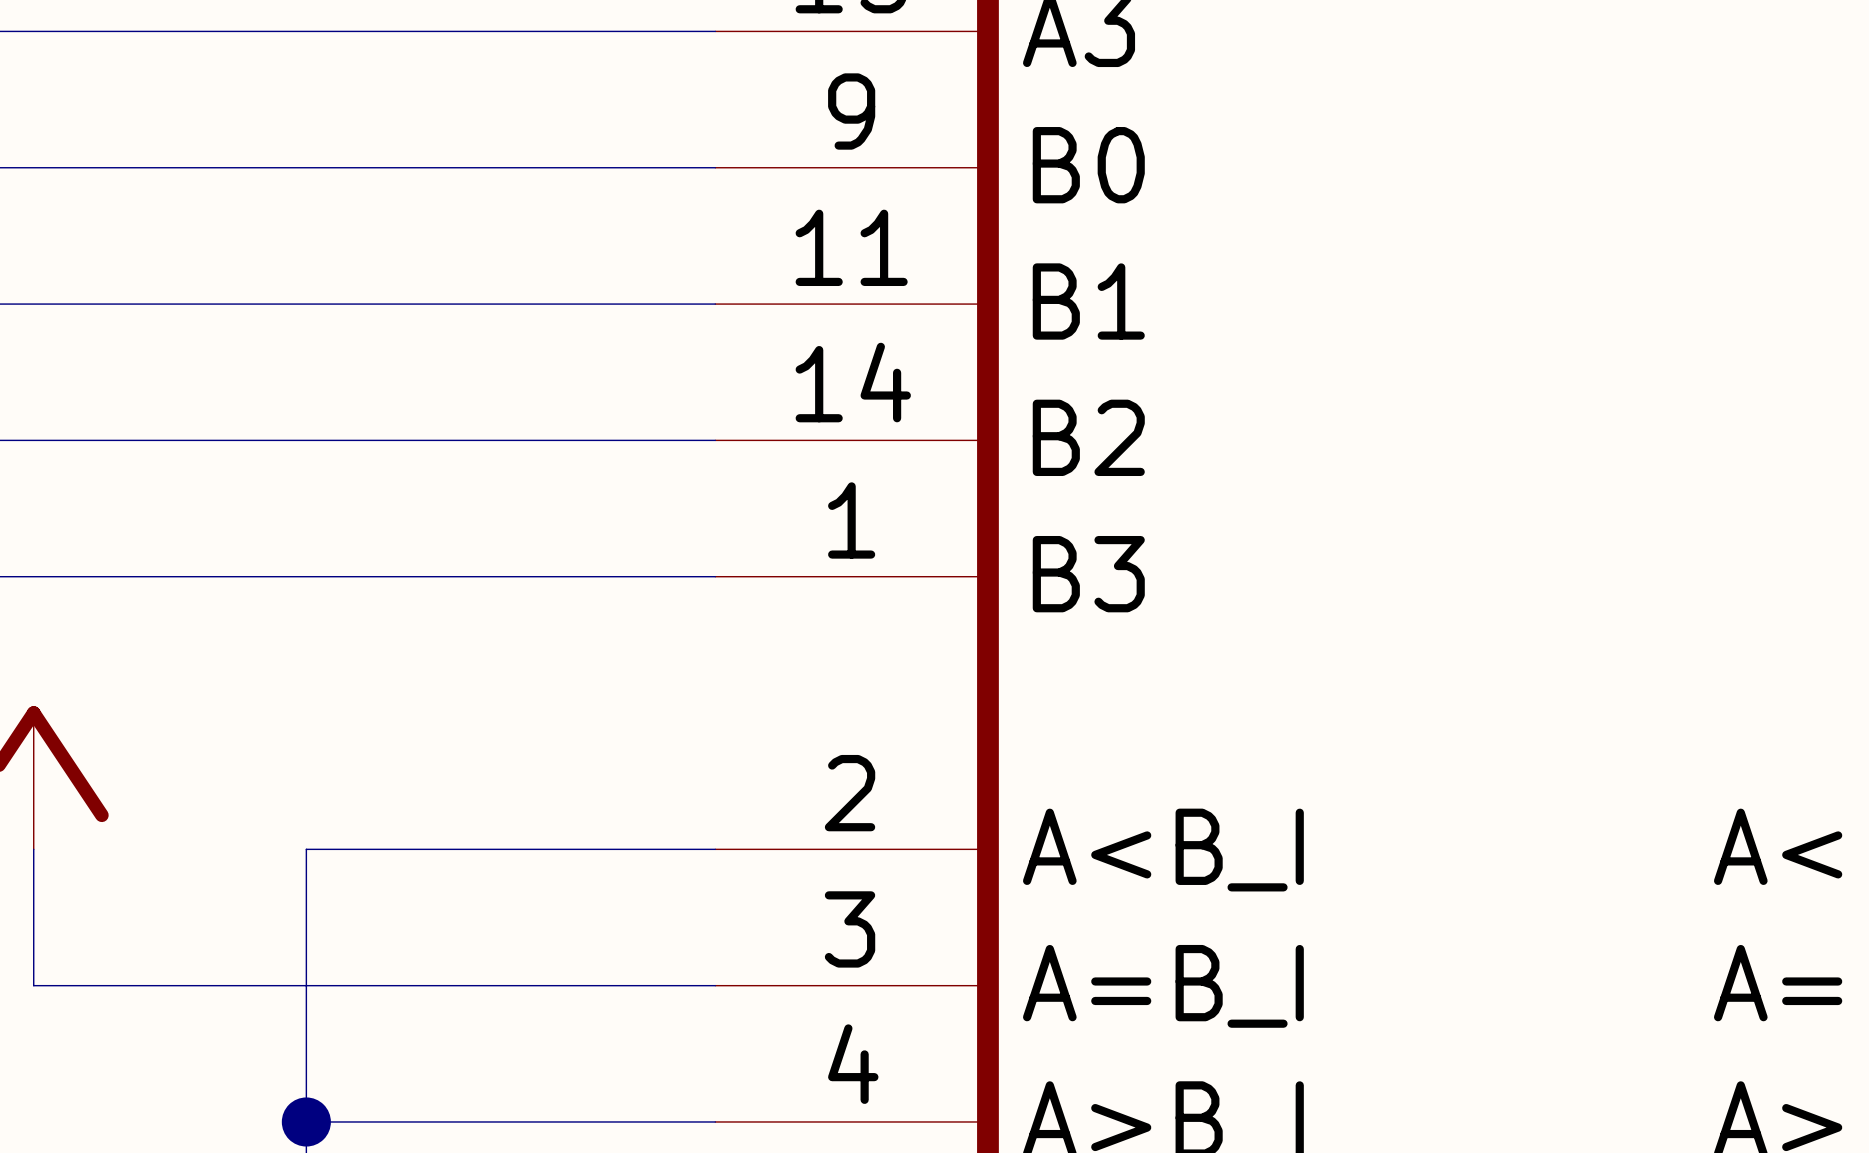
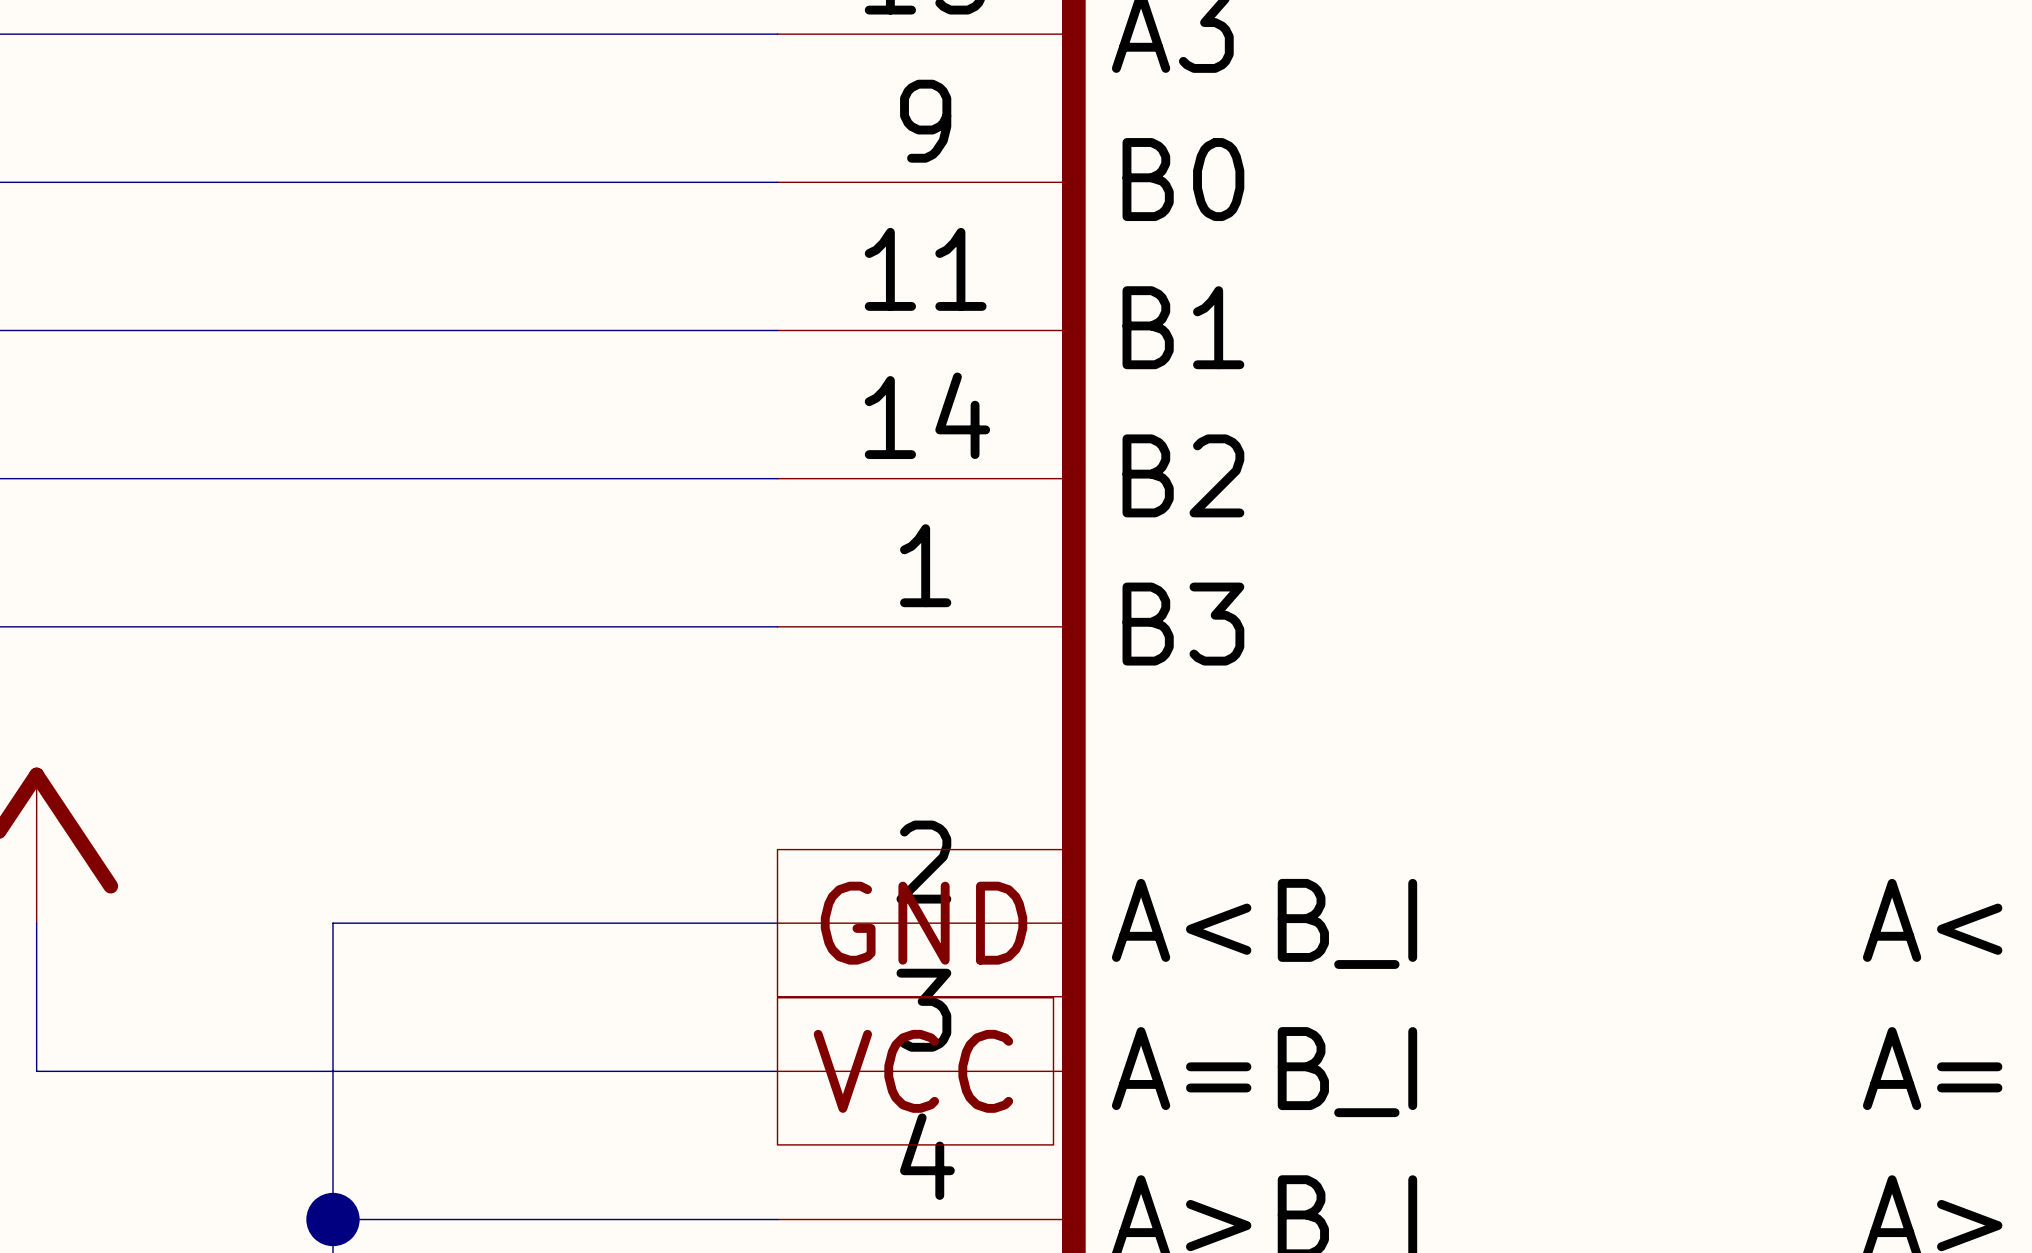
global label: none -> GND (924, 923)
global label: none -> VCC (913, 1071)

